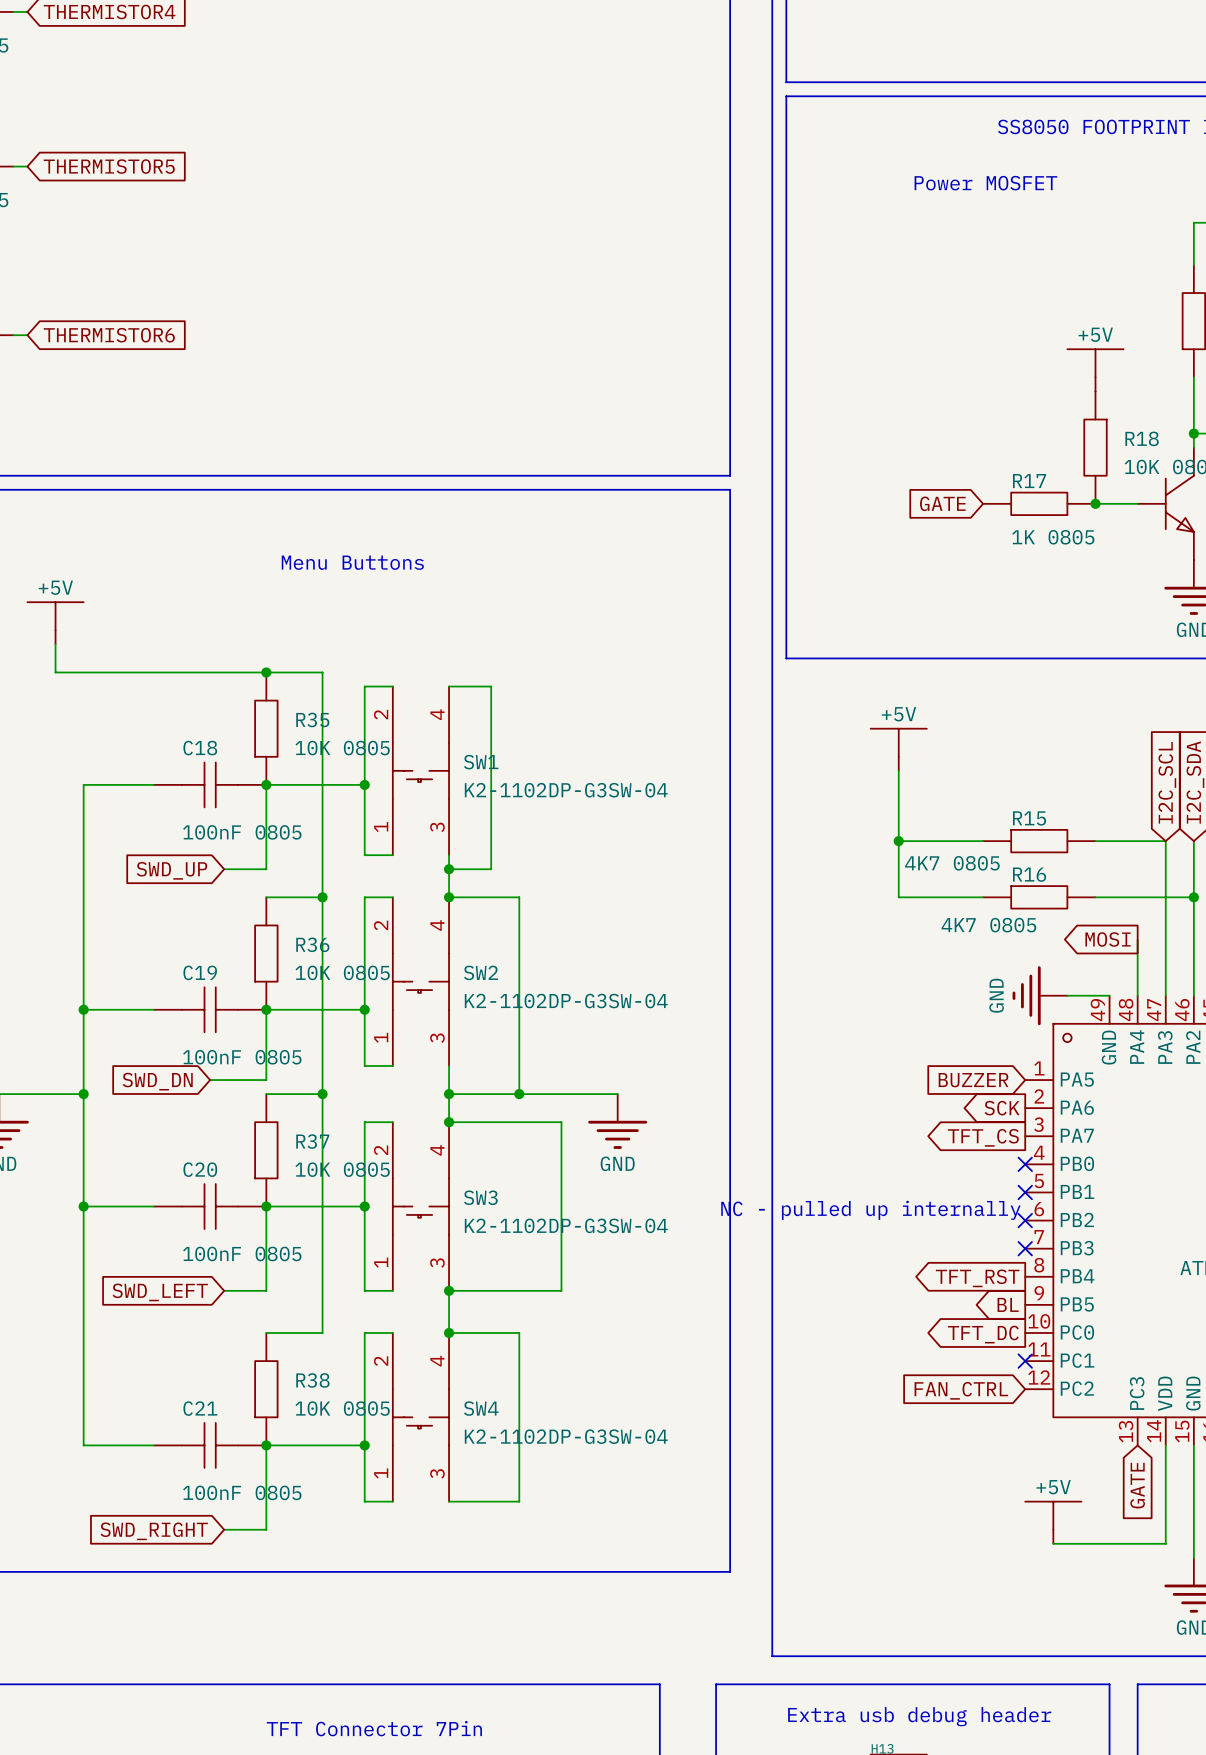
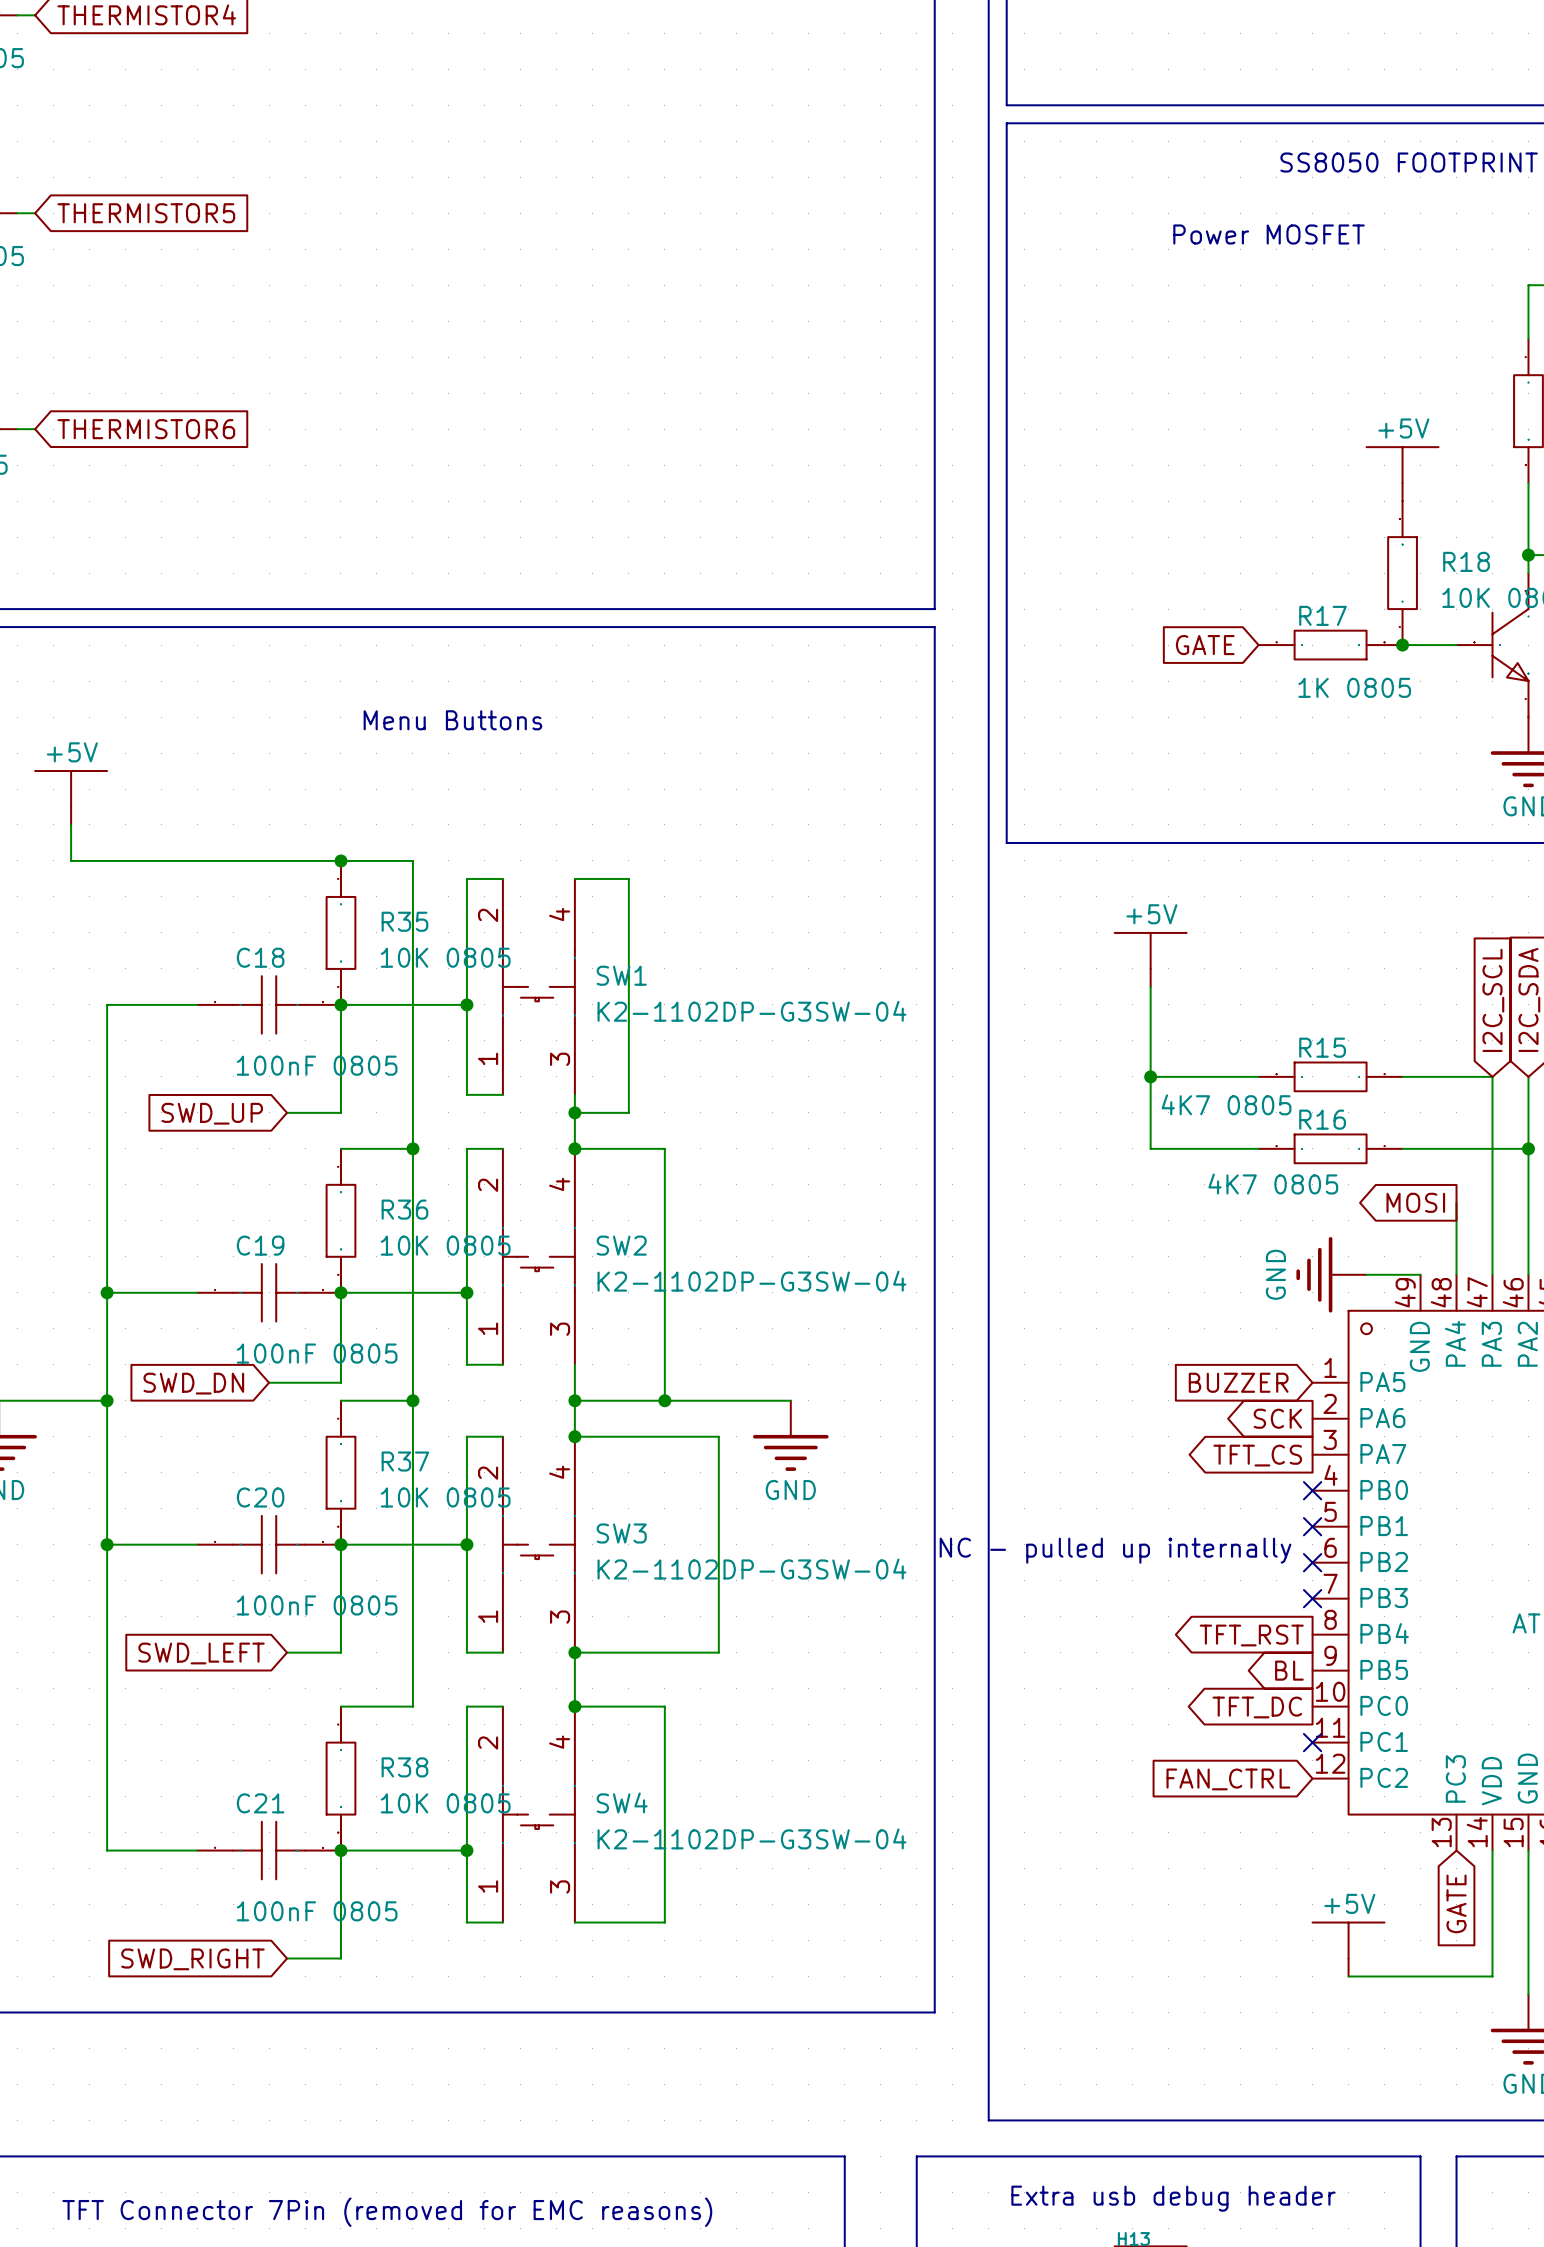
text: none -> TFT Connector 7Pin (removed for EMC reasons) (387, 2212)
text: TFT Connector 7Pin (374, 1728) -> none

